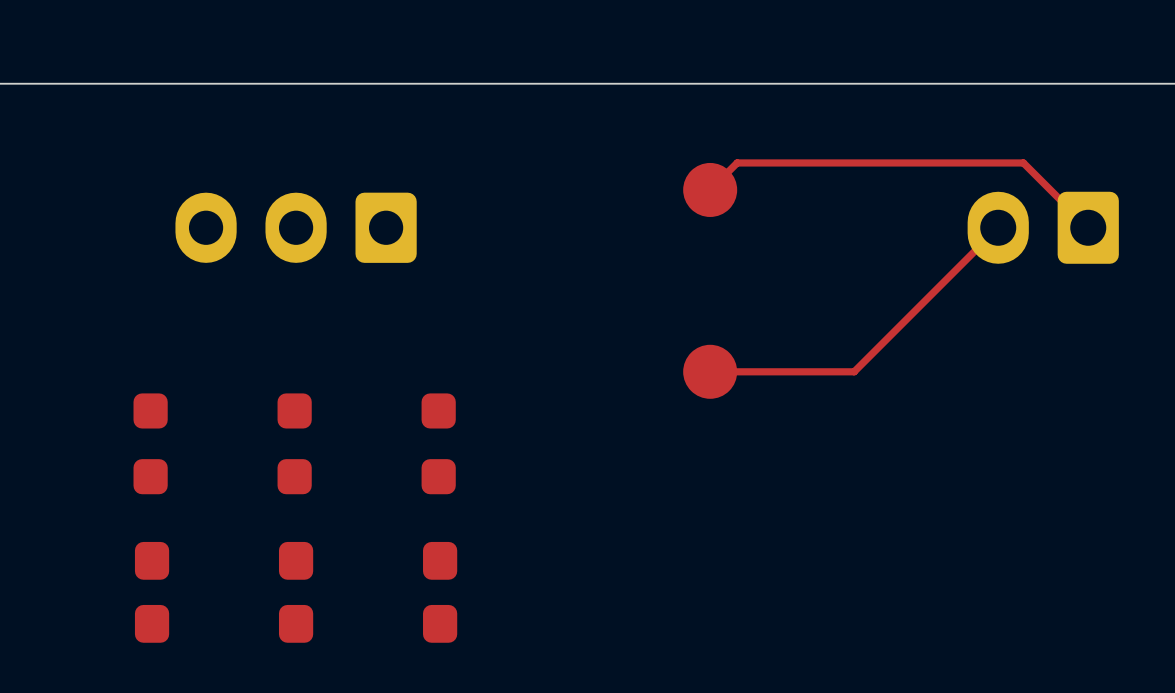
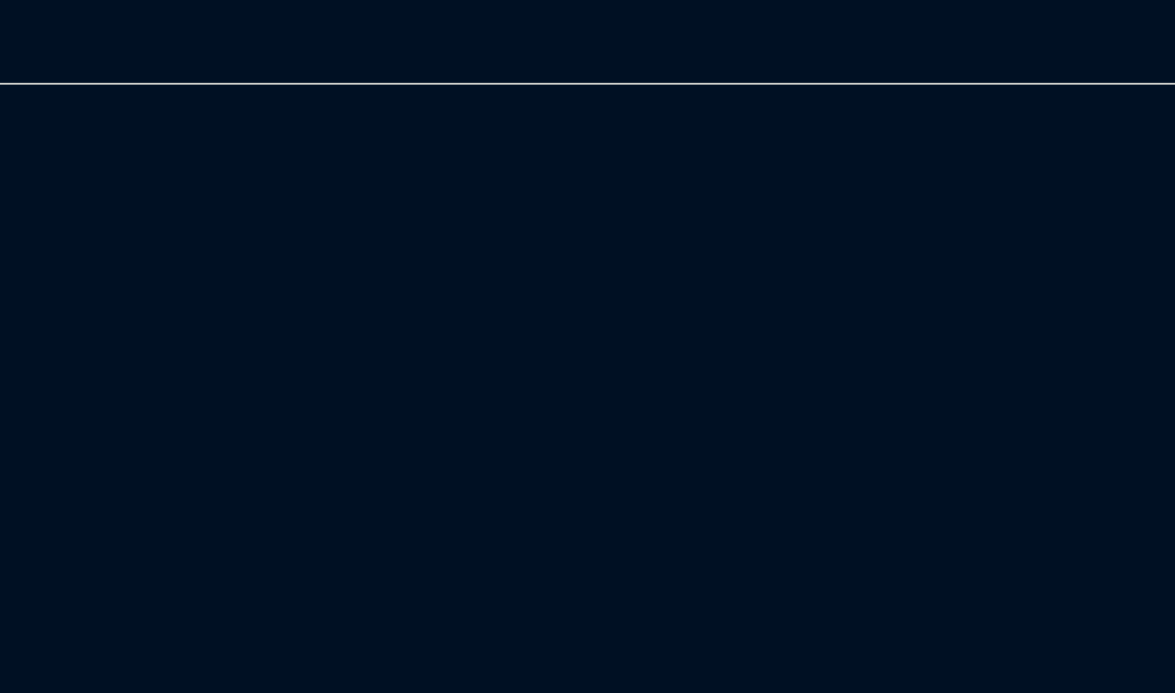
top track: (710, 189) (737, 162) (1023, 162) (1088, 227) -> none
part: (710, 189) -> none
part: (296, 227) -> none
top track: (998, 227) (854, 371) (710, 371) -> none
part: (1043, 227) -> none
part: (710, 371) -> none
part: (150, 443) -> none
part: (294, 443) -> none
part: (438, 443) -> none
part: (152, 592) -> none
part: (296, 592) -> none
part: (440, 592) -> none

